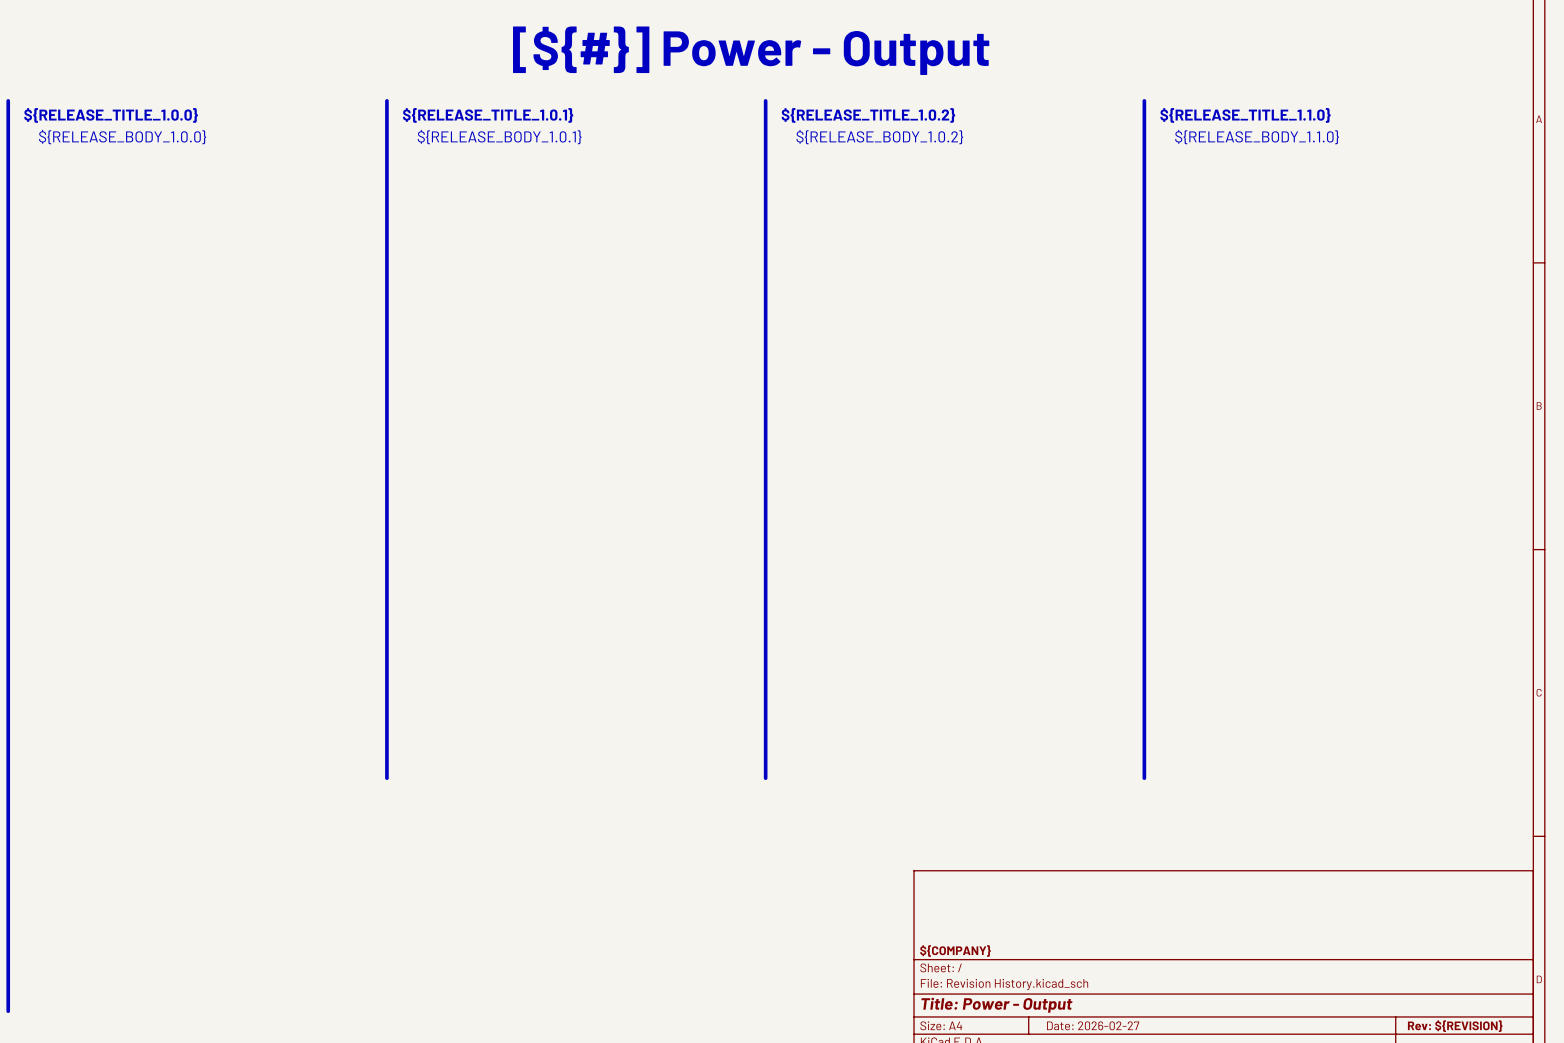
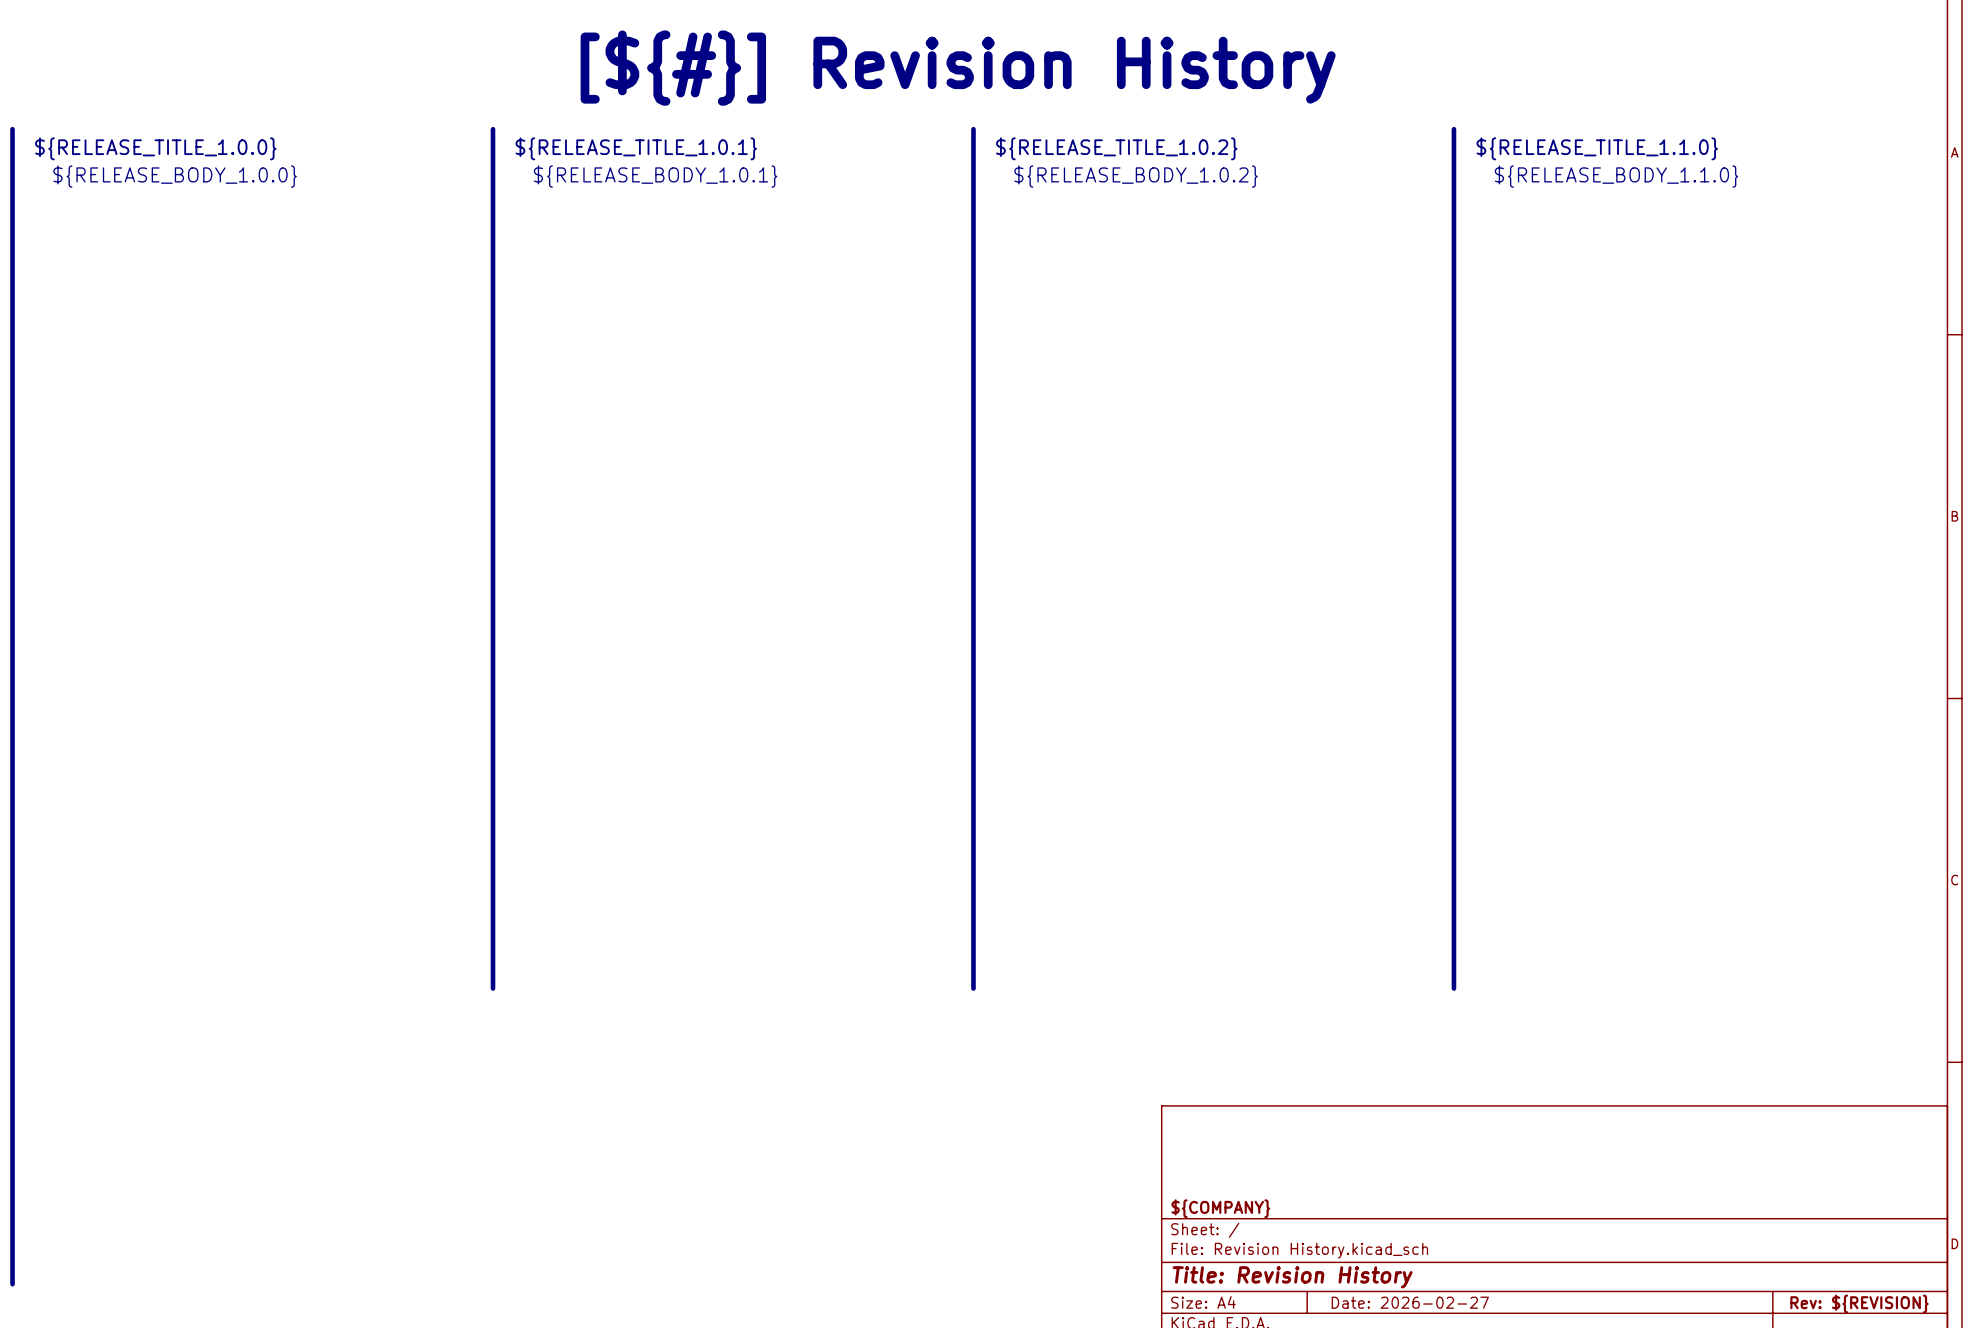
text: [${#}] Power - Output (751, 50) -> [${#}] Revision History (958, 68)
title block: Title: Power - Output (996, 1005) -> Title: Revision History (1292, 1277)

